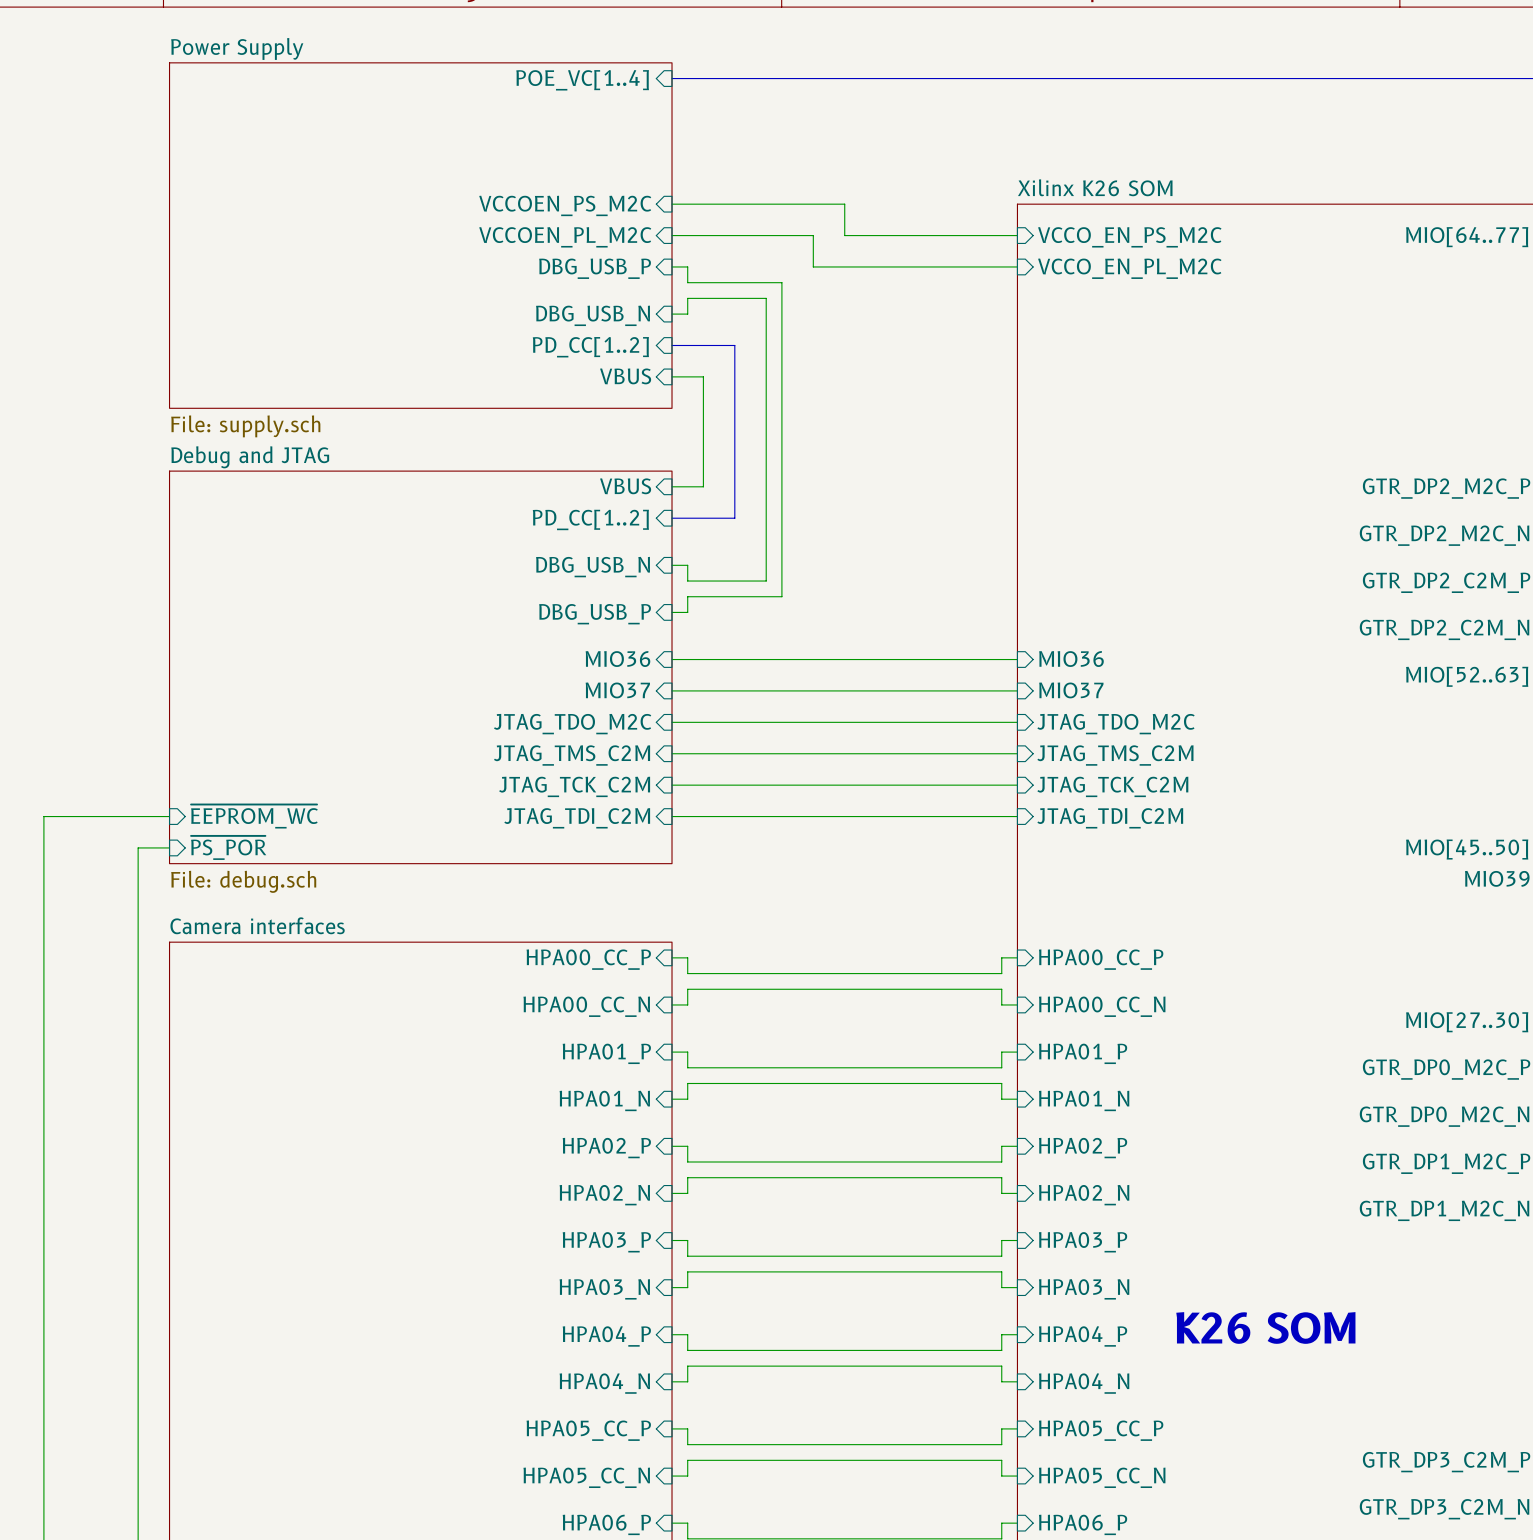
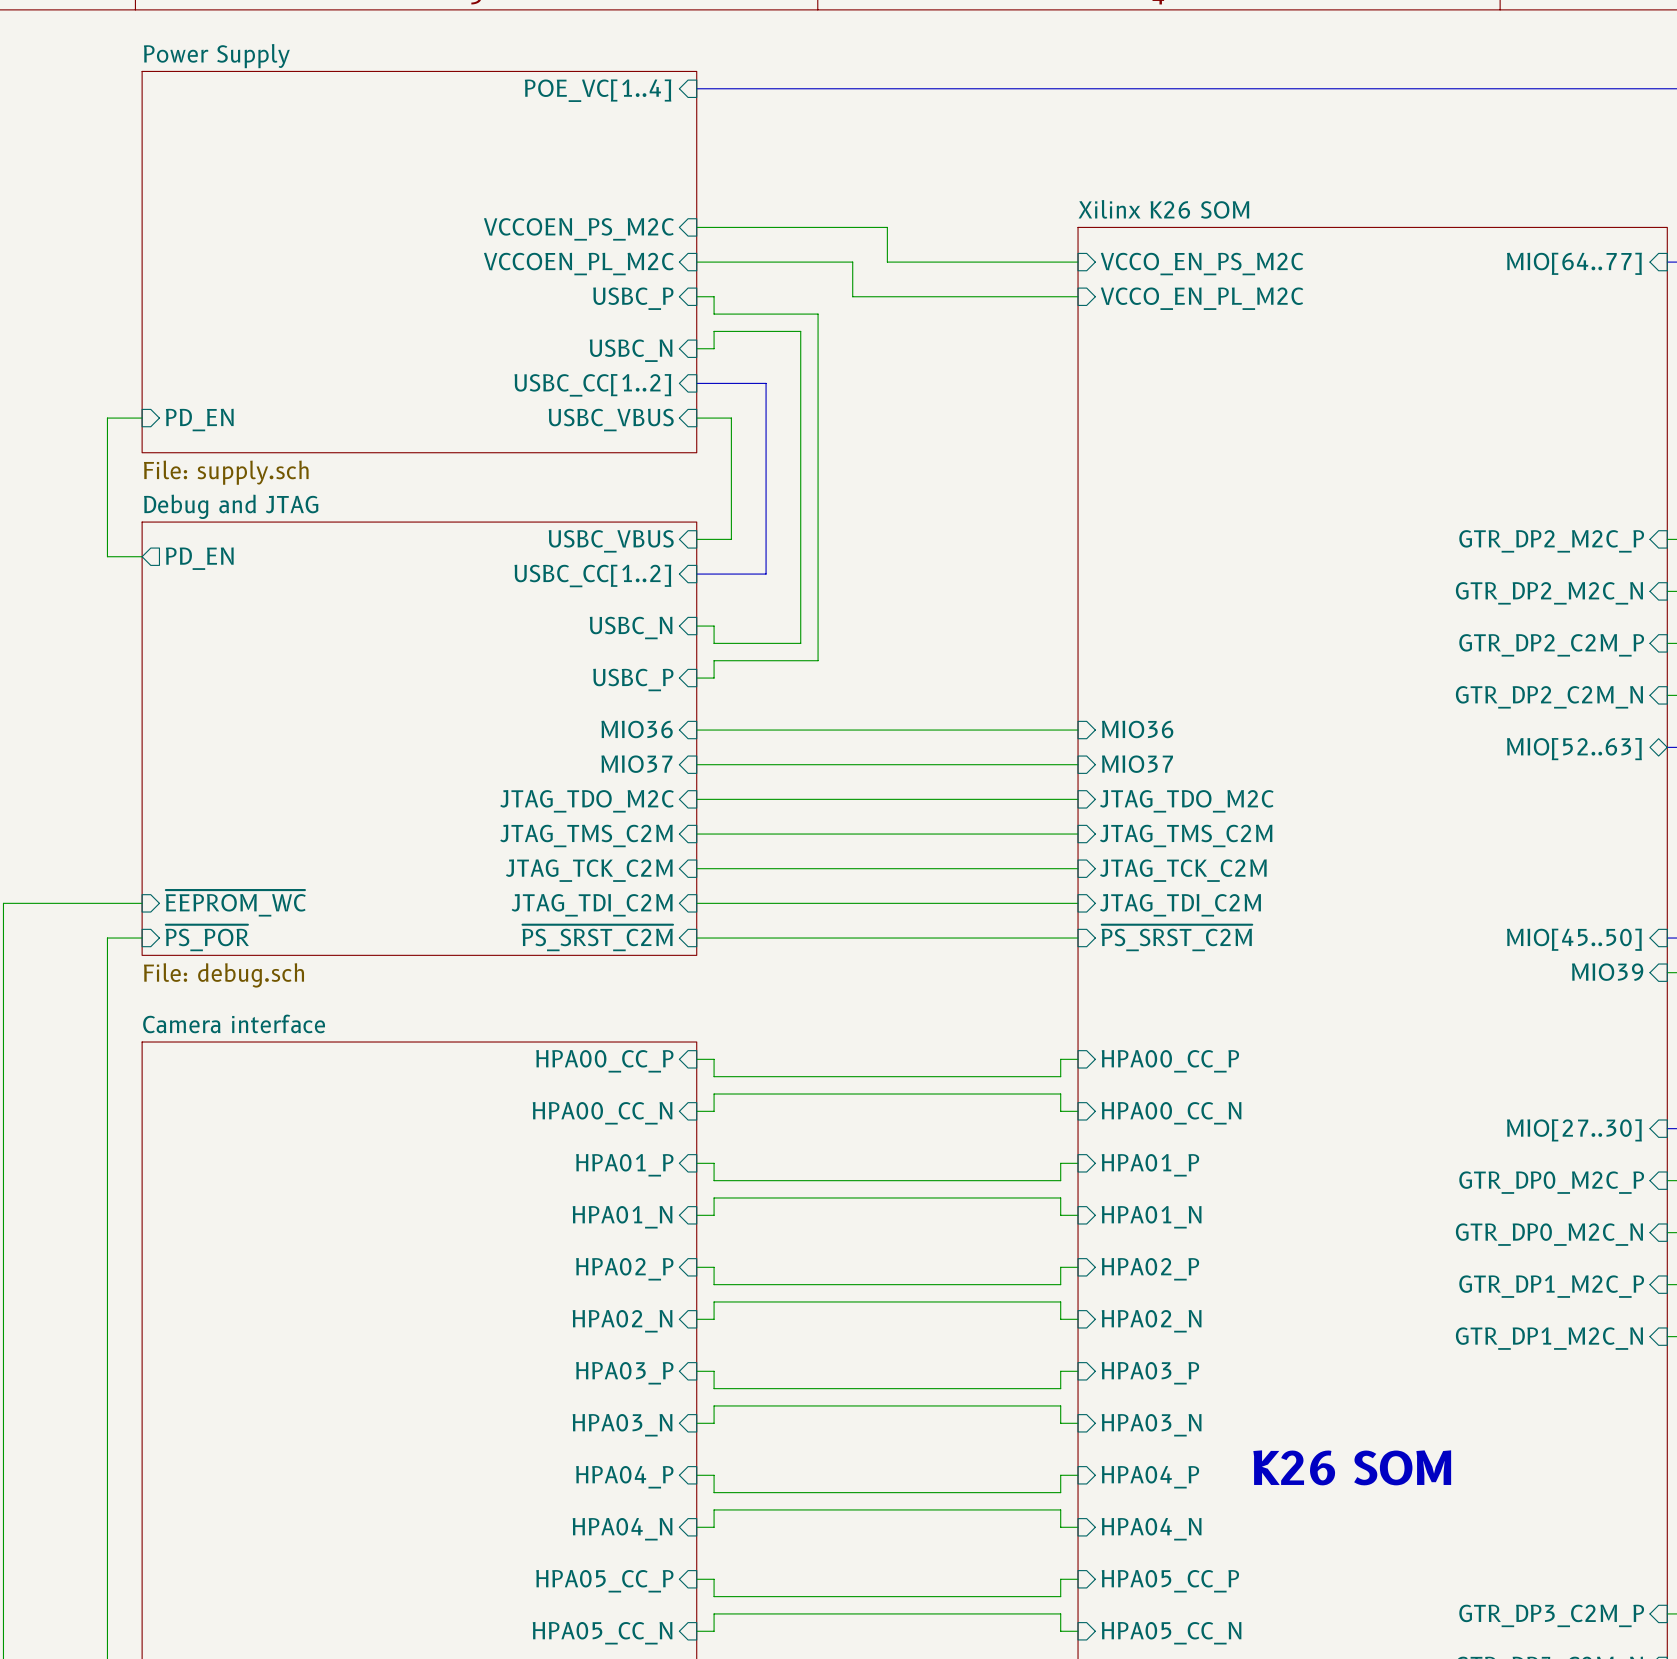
sheet pin: DBG_USB_P (595, 268) -> USBC_P (633, 298)
sheet pin: DBG_USB_N (593, 315) -> USBC_N (631, 350)
sheet pin: PD_CC[1..2] (590, 347) -> USBC_CC[1..2] (592, 385)
wire: none -> (142, 418) (107, 418) (107, 556) (142, 556)
sheet pin: VBUS (625, 376) -> USBC_VBUS (611, 420)
sheet pin: none -> PD_EN (199, 420)
sheet pin: VBUS (625, 486) -> USBC_VBUS (611, 541)
sheet pin: none -> PD_EN (199, 558)
sheet pin: PD_CC[1..2] (590, 519) -> USBC_CC[1..2] (592, 576)
sheet pin: DBG_USB_N (593, 567) -> USBC_N (631, 627)
sheet pin: DBG_USB_P (595, 614) -> USBC_P (633, 679)
sheet pin: none -> ~{PS_SRST_C2M} (597, 937)
wire: none -> (696, 938) (1078, 938)
sheet pin: none -> ~{PS_SRST_C2M} (1177, 937)
sheet Camera interfaces name: Camera interfaces (257, 925) -> Camera interface (234, 1023)

